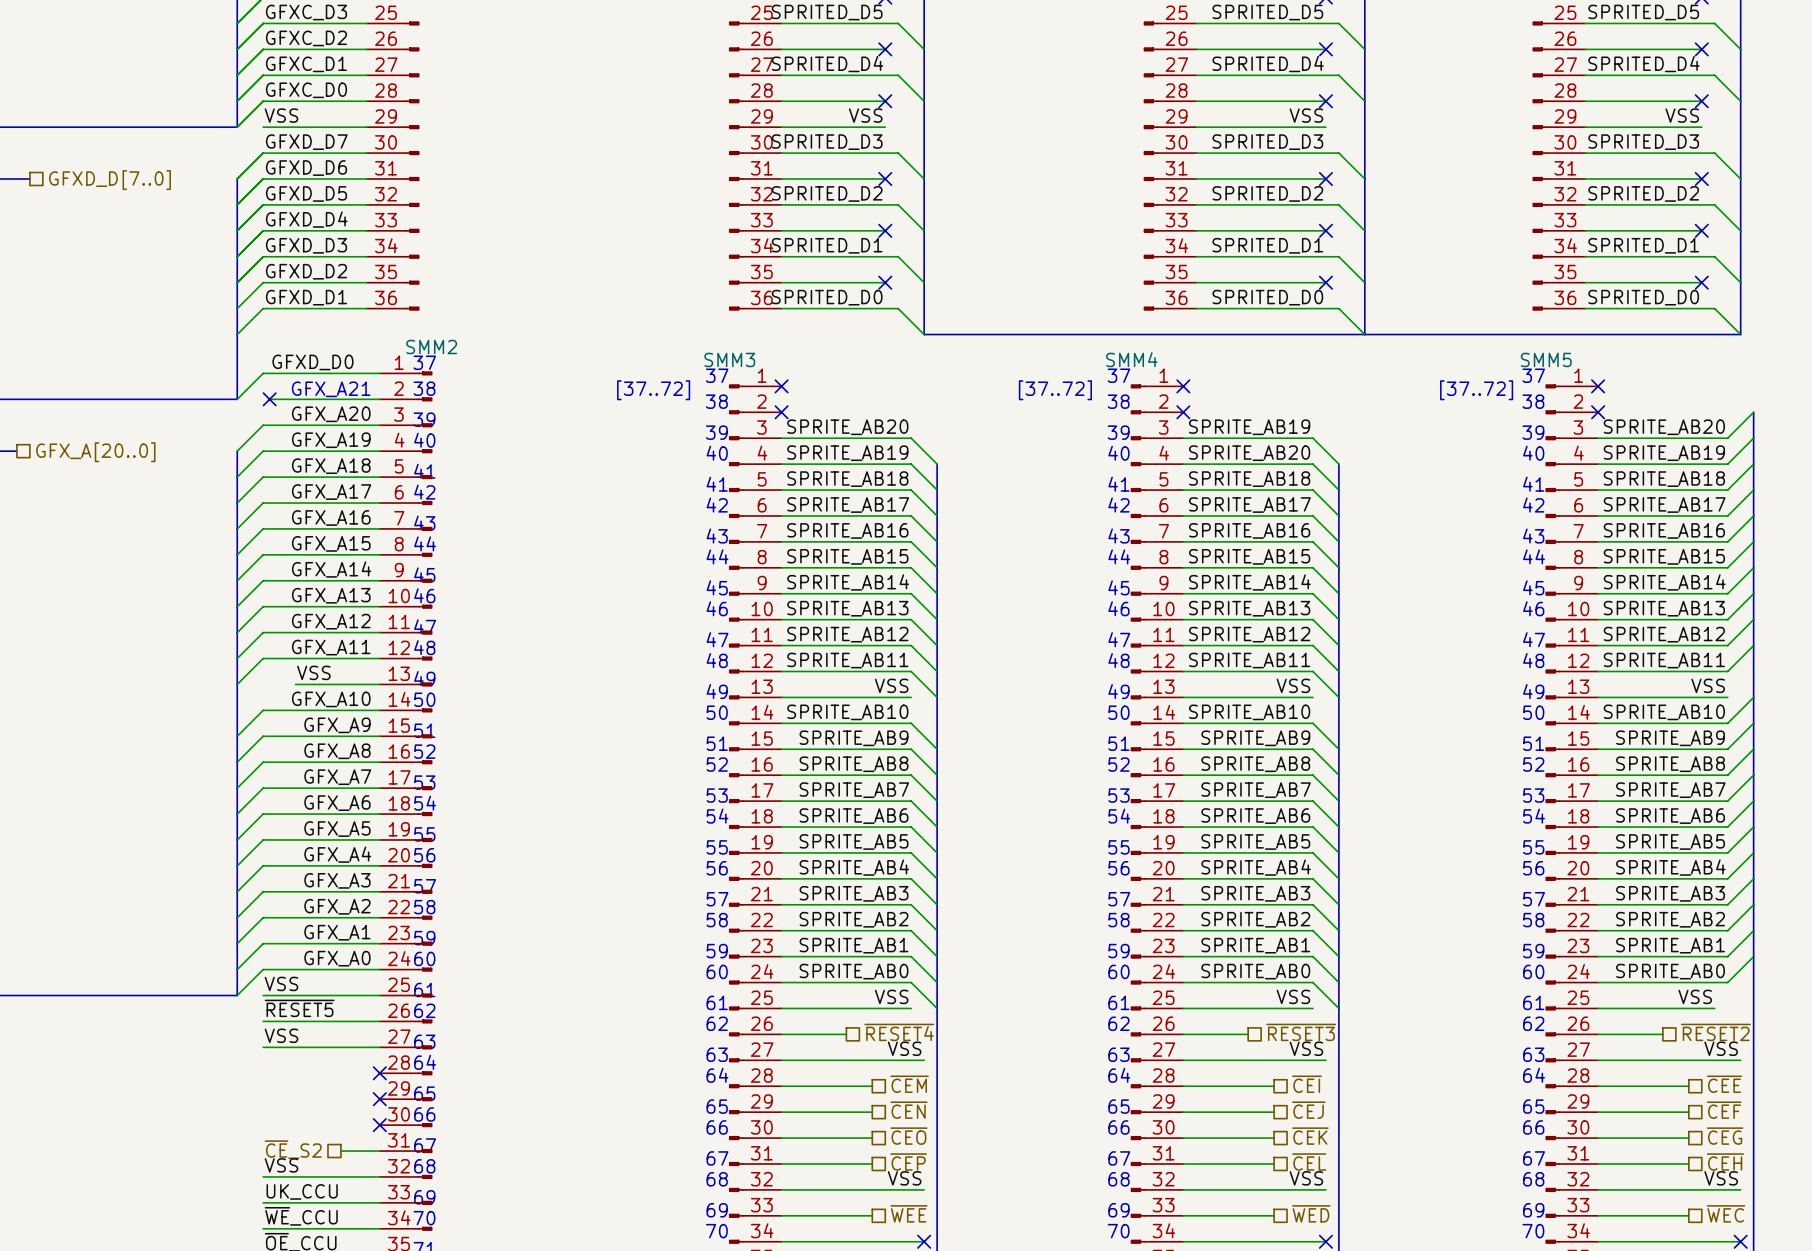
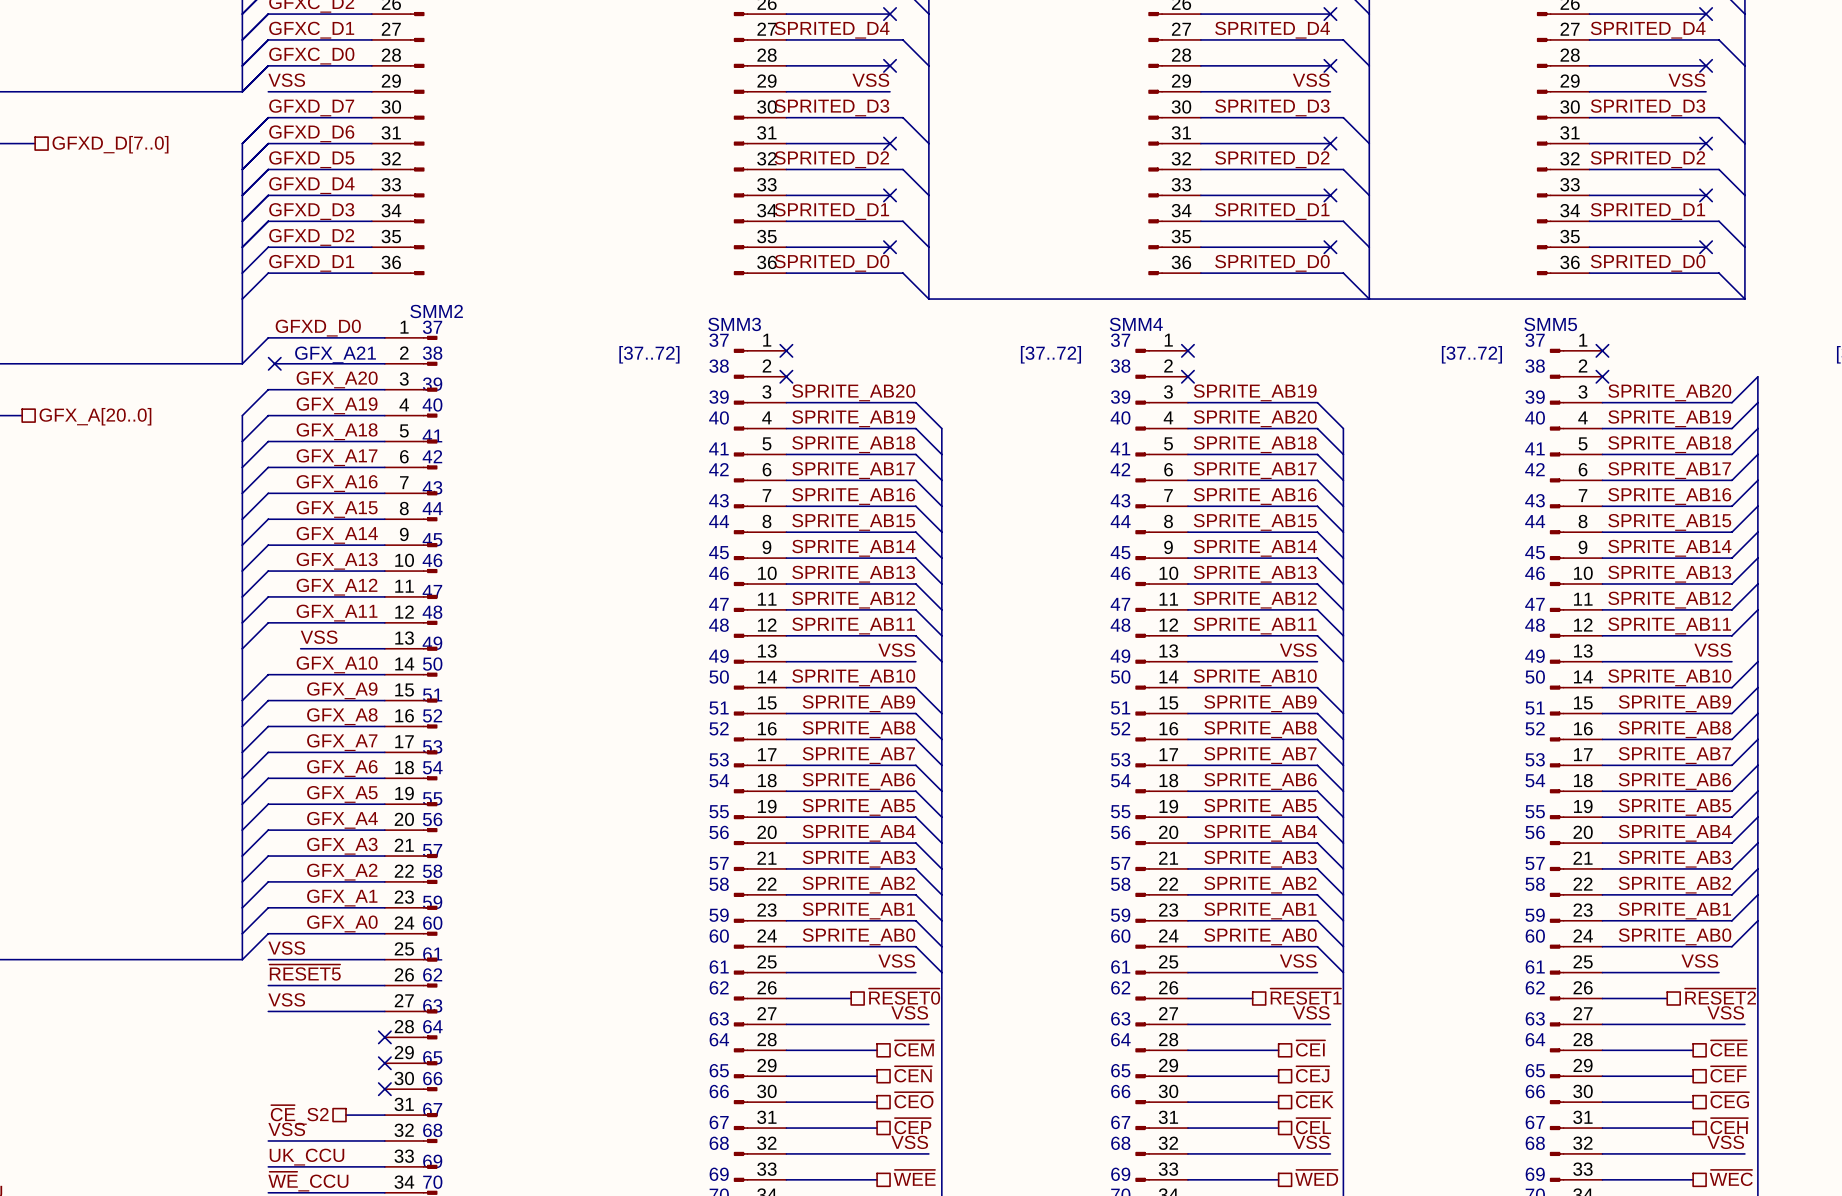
hierarchical label: ~{RESET4} (899, 1032) -> ~{RESET0} (904, 996)
hierarchical label: ~{RESET3} (1301, 1032) -> ~{RESET1} (1305, 996)

